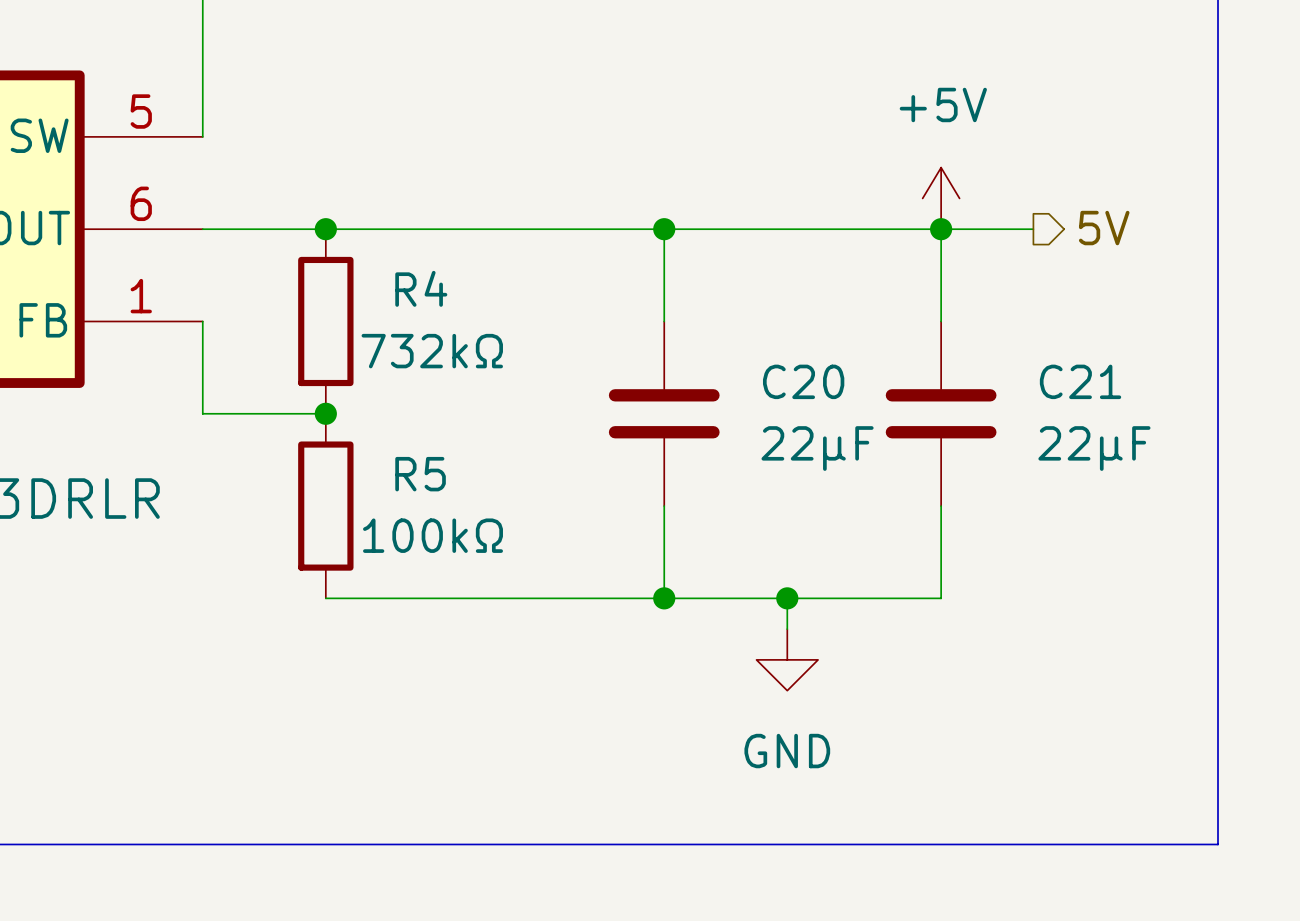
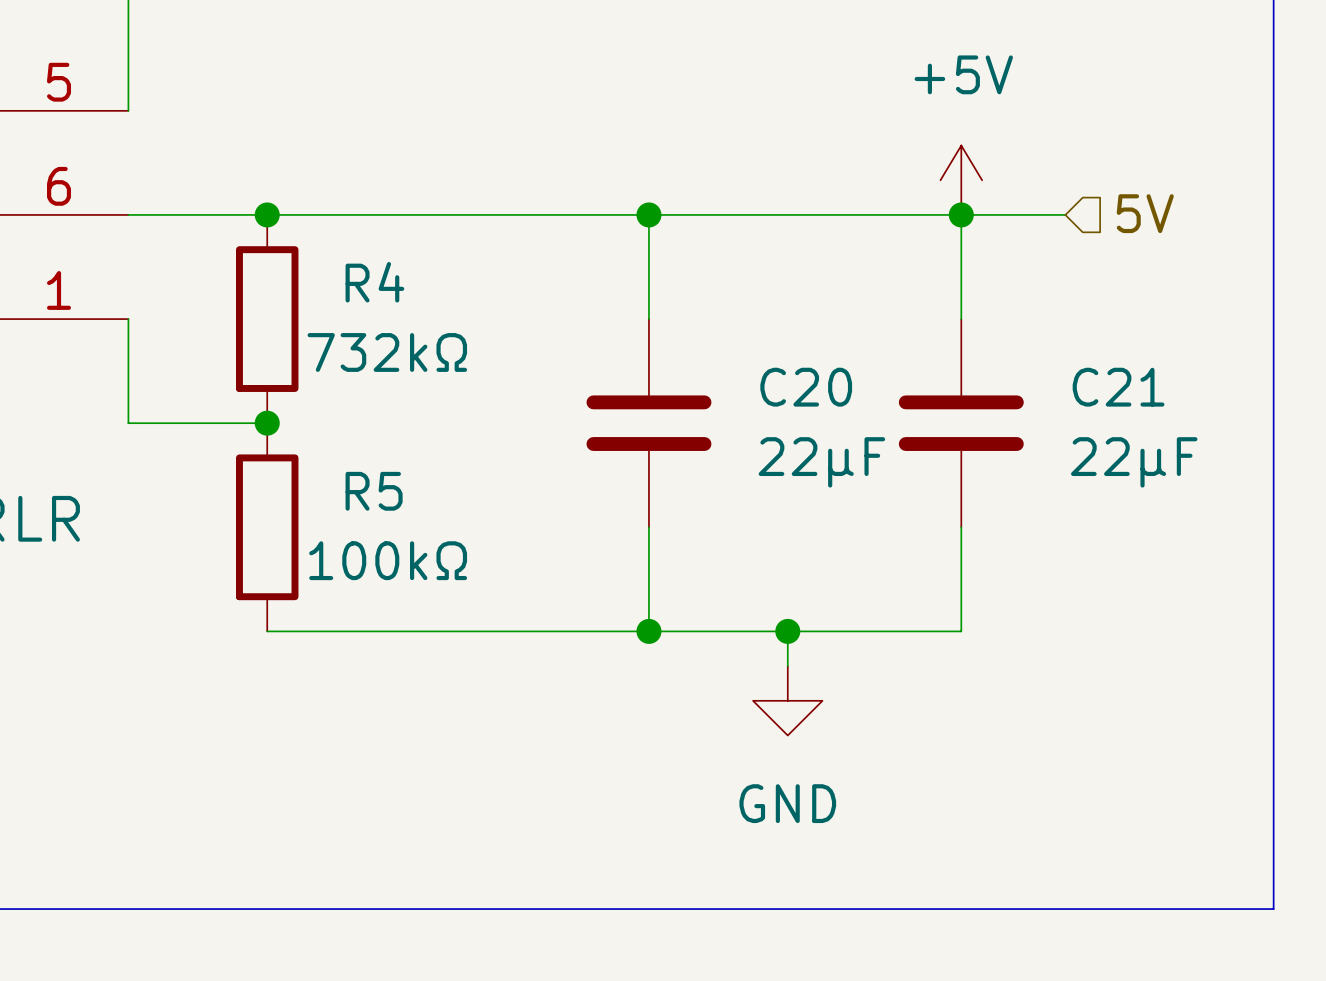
hierarchical label shape: output (1104, 228) -> input (1145, 213)

